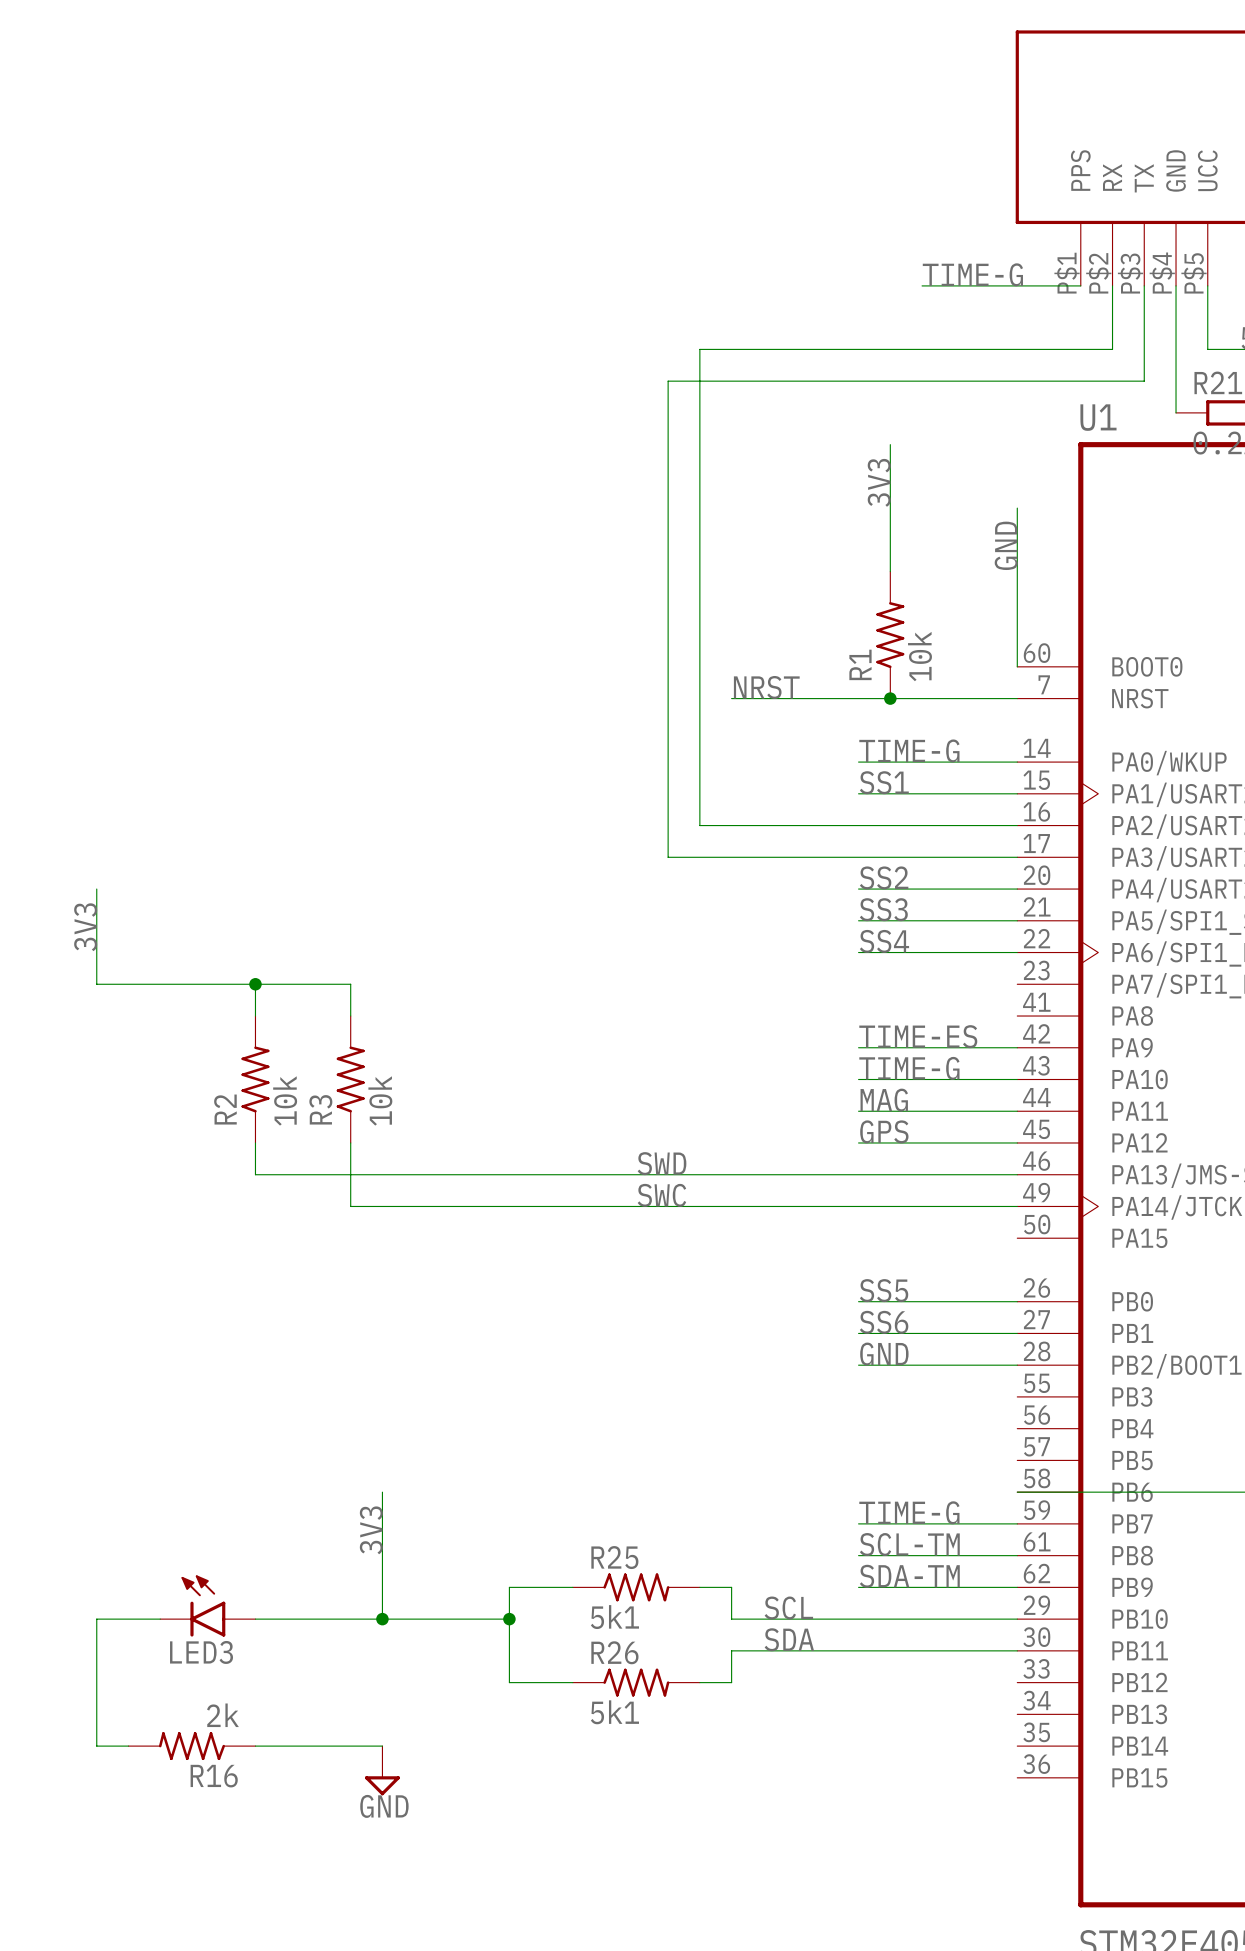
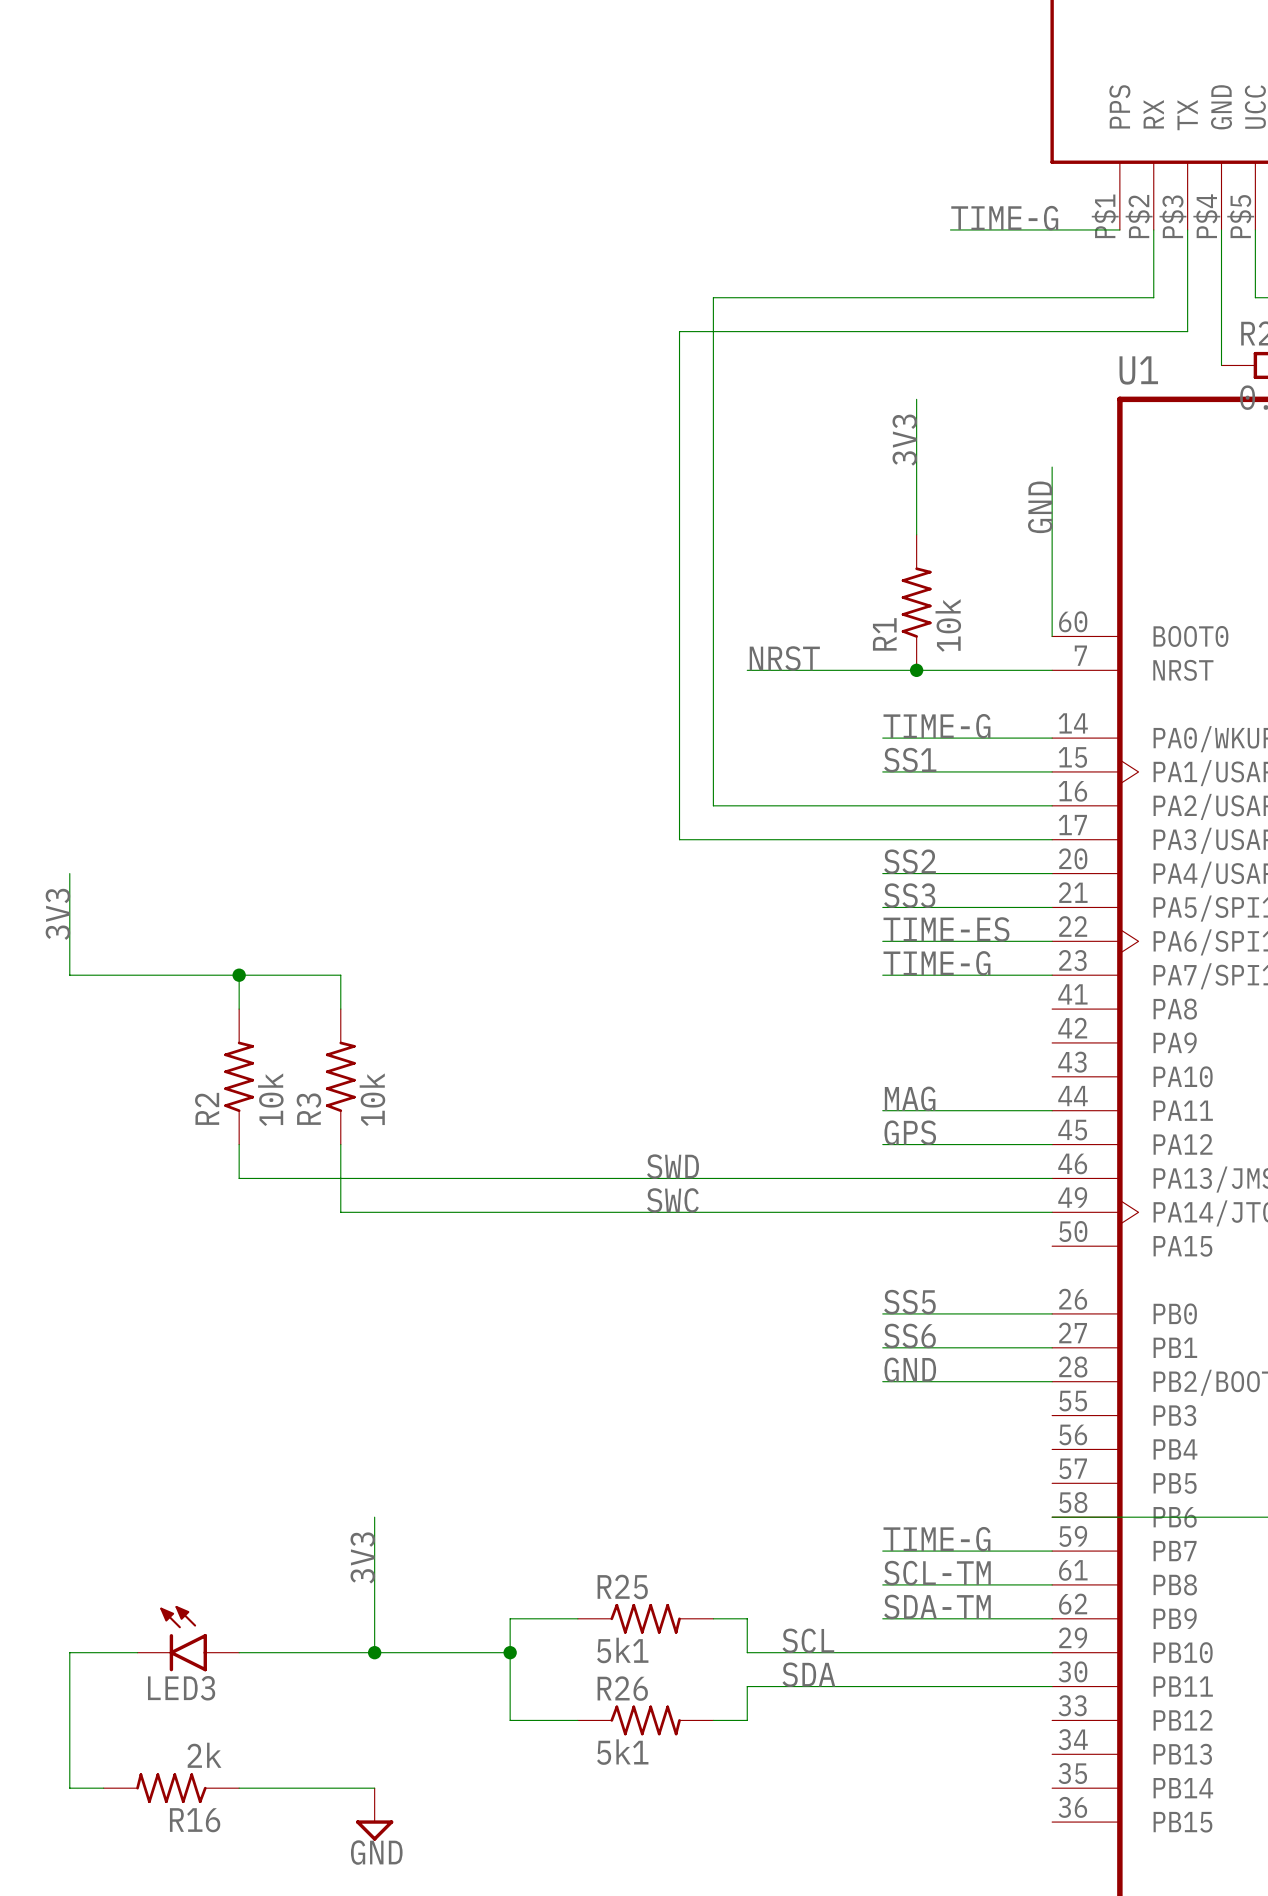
label: SS4 (884, 941) -> TIME-ES (946, 929)
label: TIME-ES (918, 1036) -> none
wire: (858, 1047) (1017, 1047) -> (882, 975) (1052, 975)
label position: TIME-G (909, 1068) -> TIME-G (936, 963)
wire: (858, 1079) (1017, 1079) -> none

